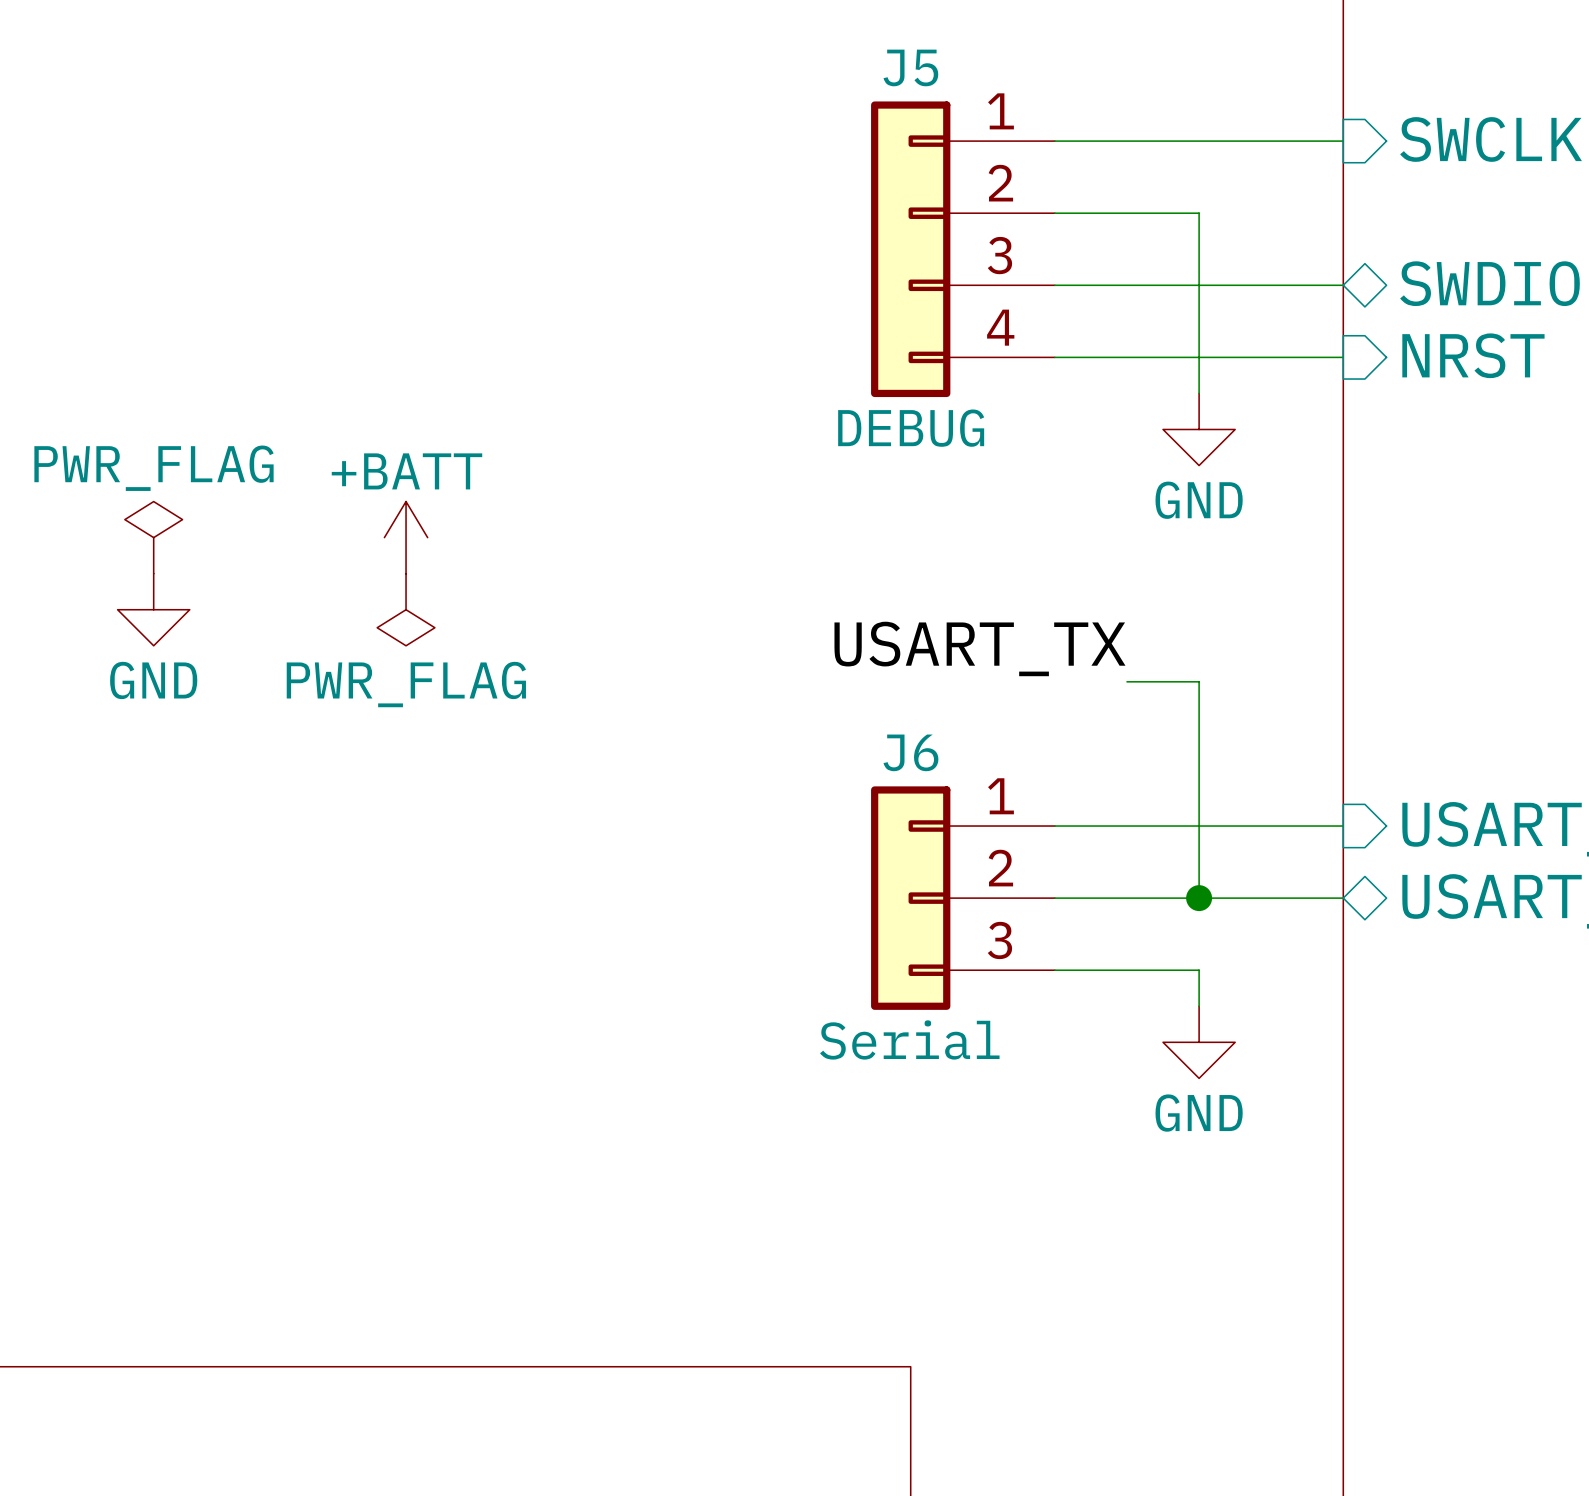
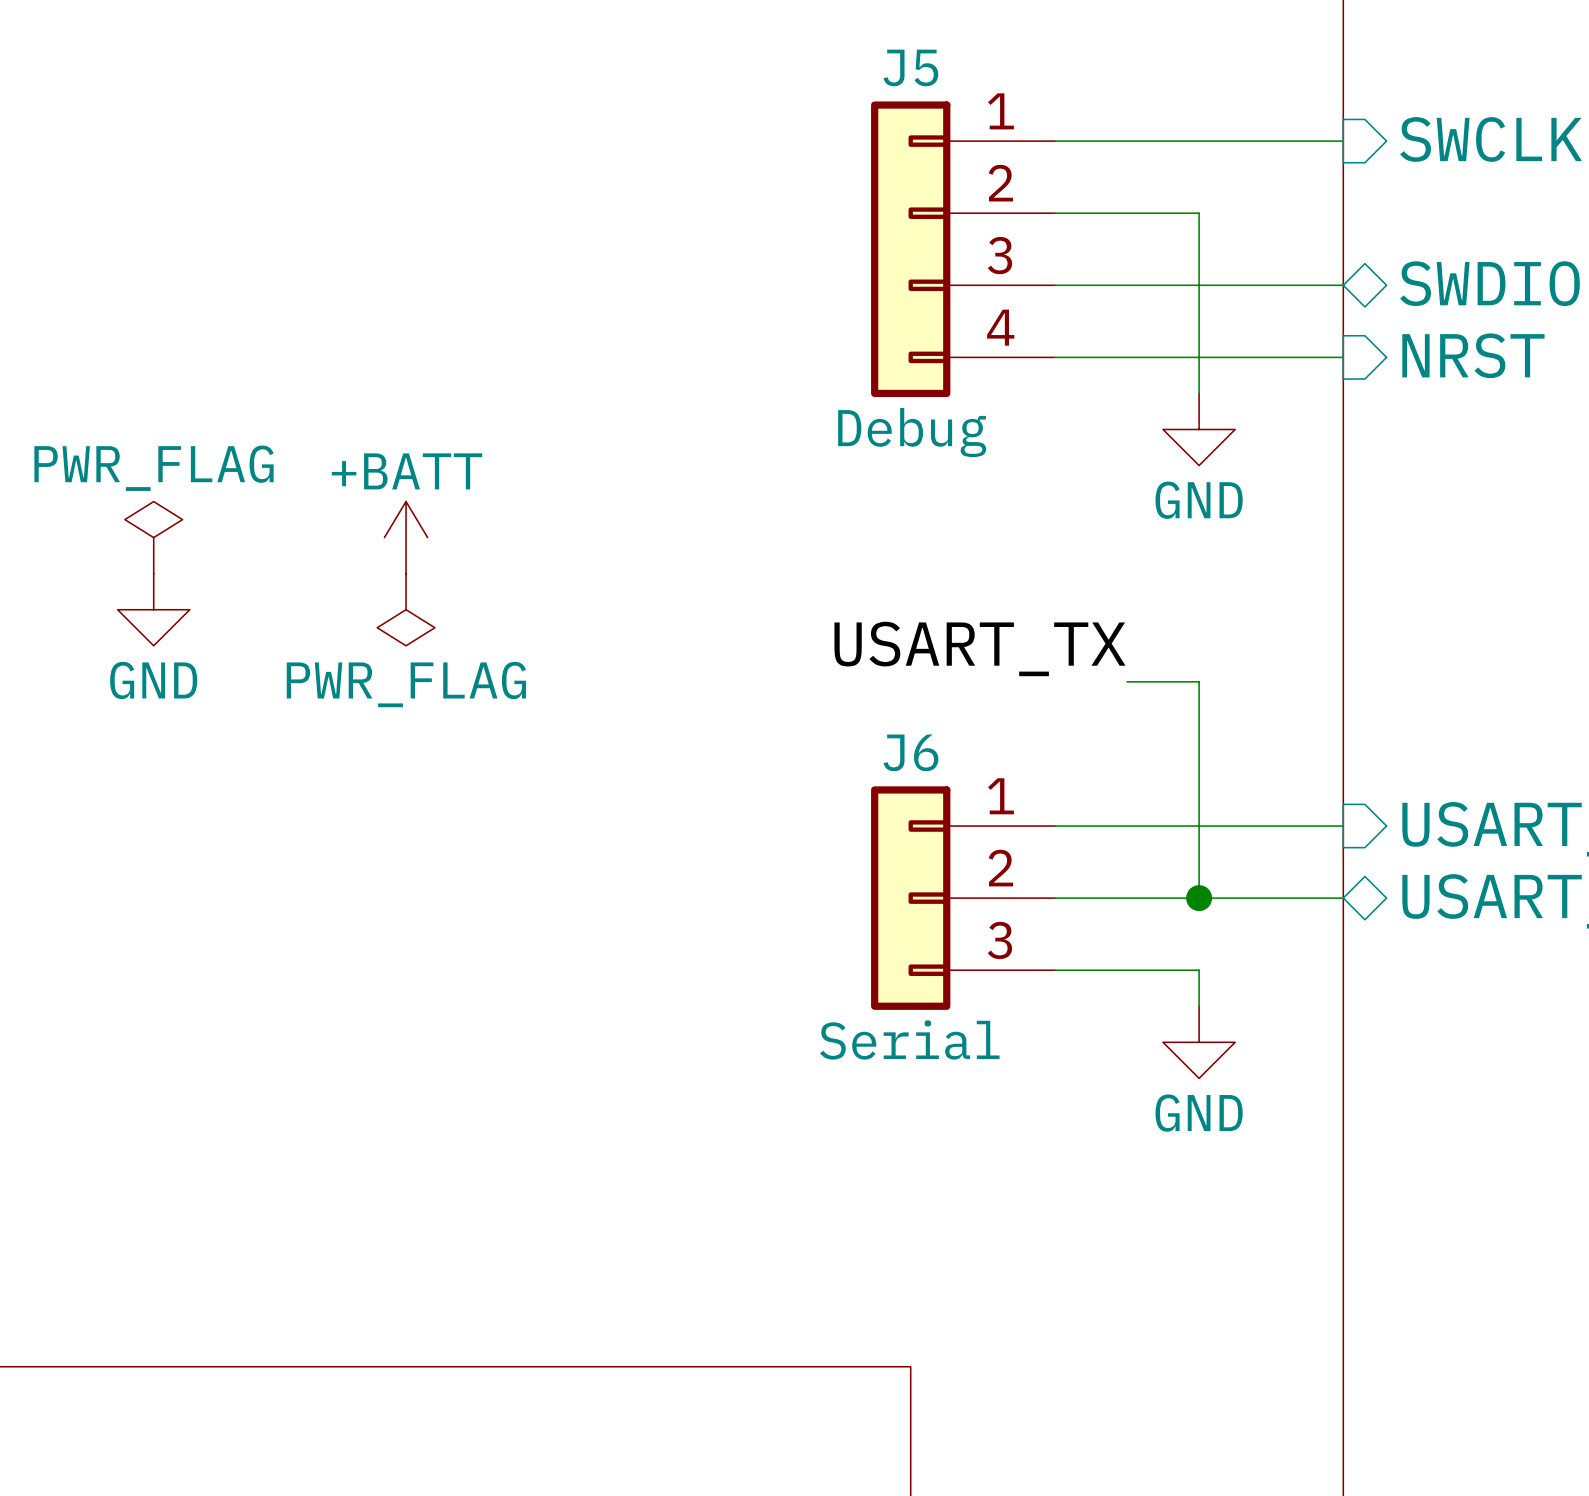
J5 value: DEBUG (911, 428) -> Debug (912, 432)

